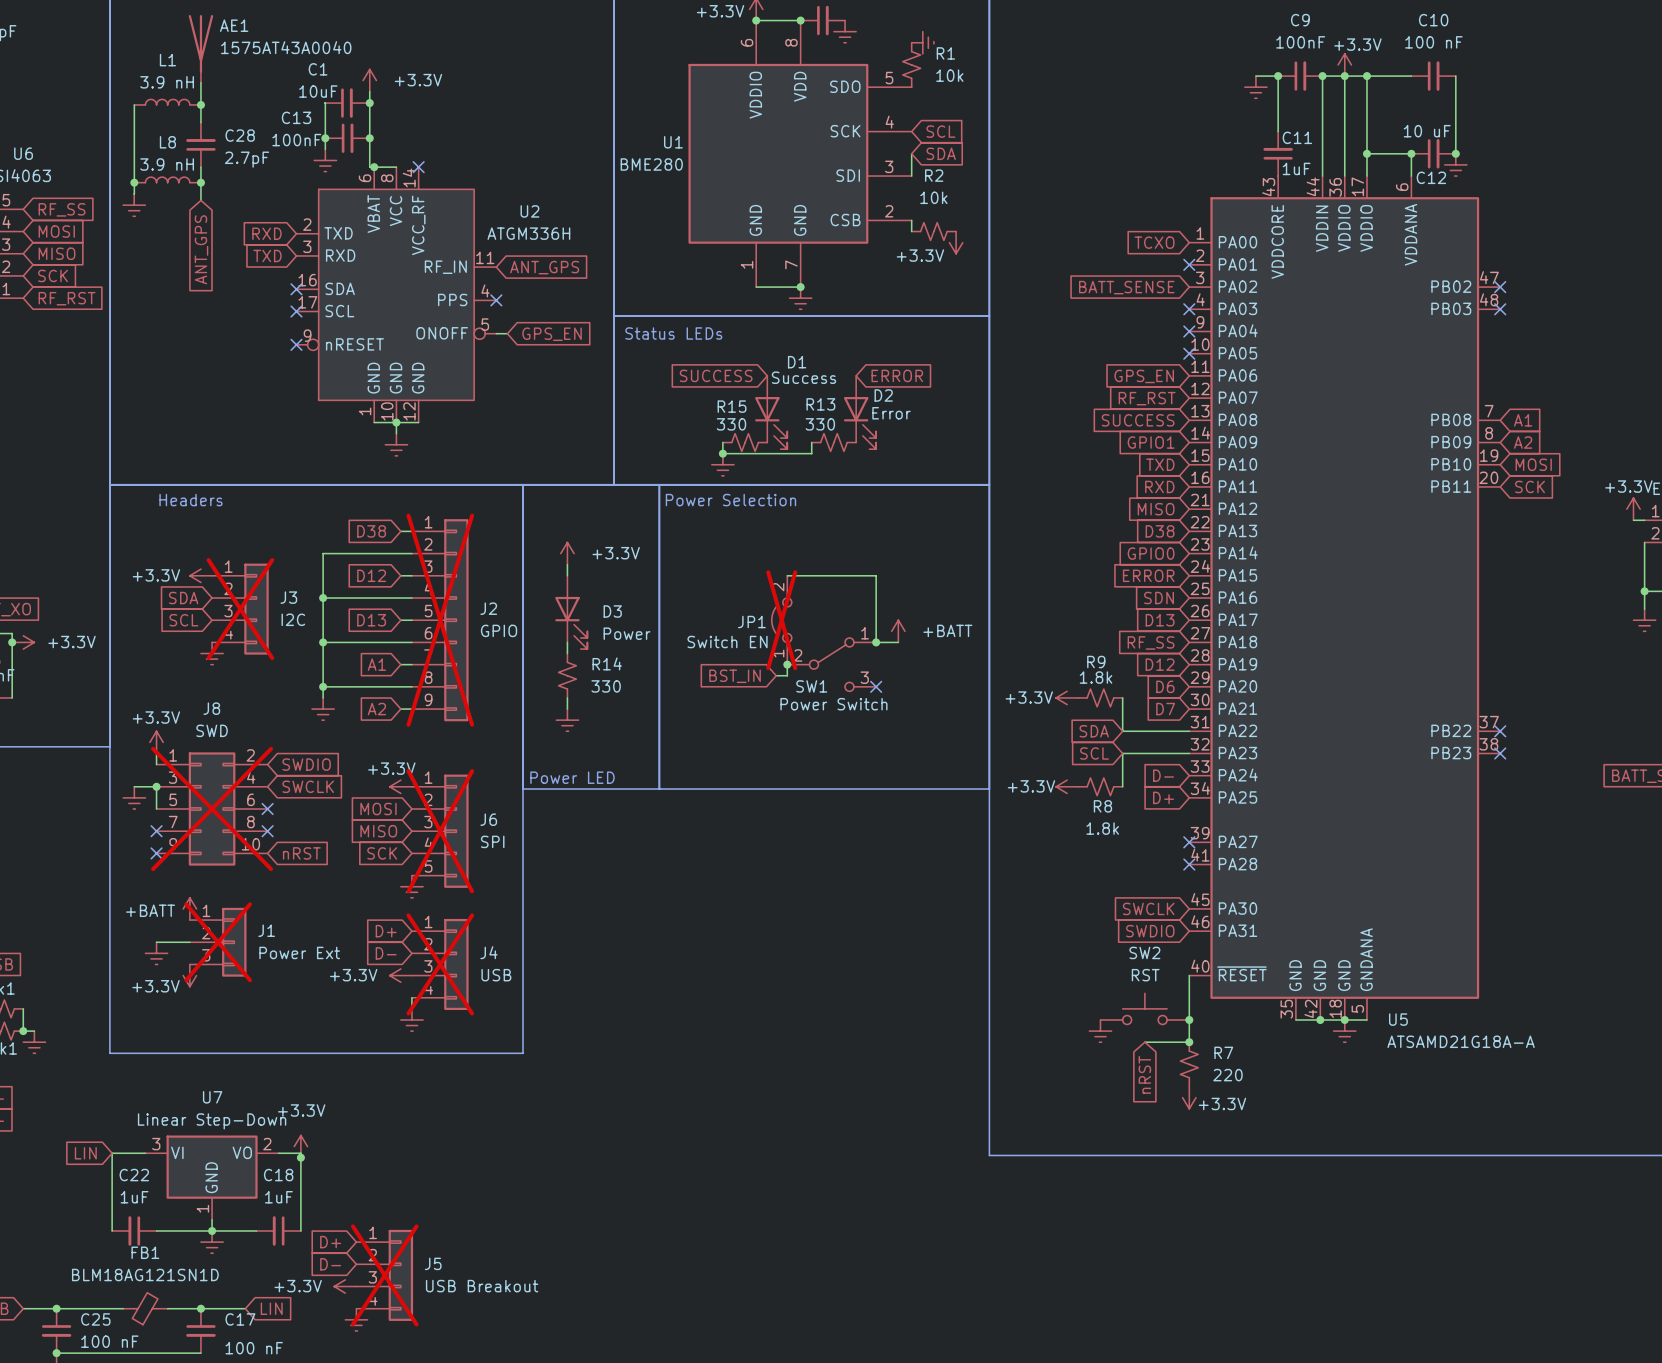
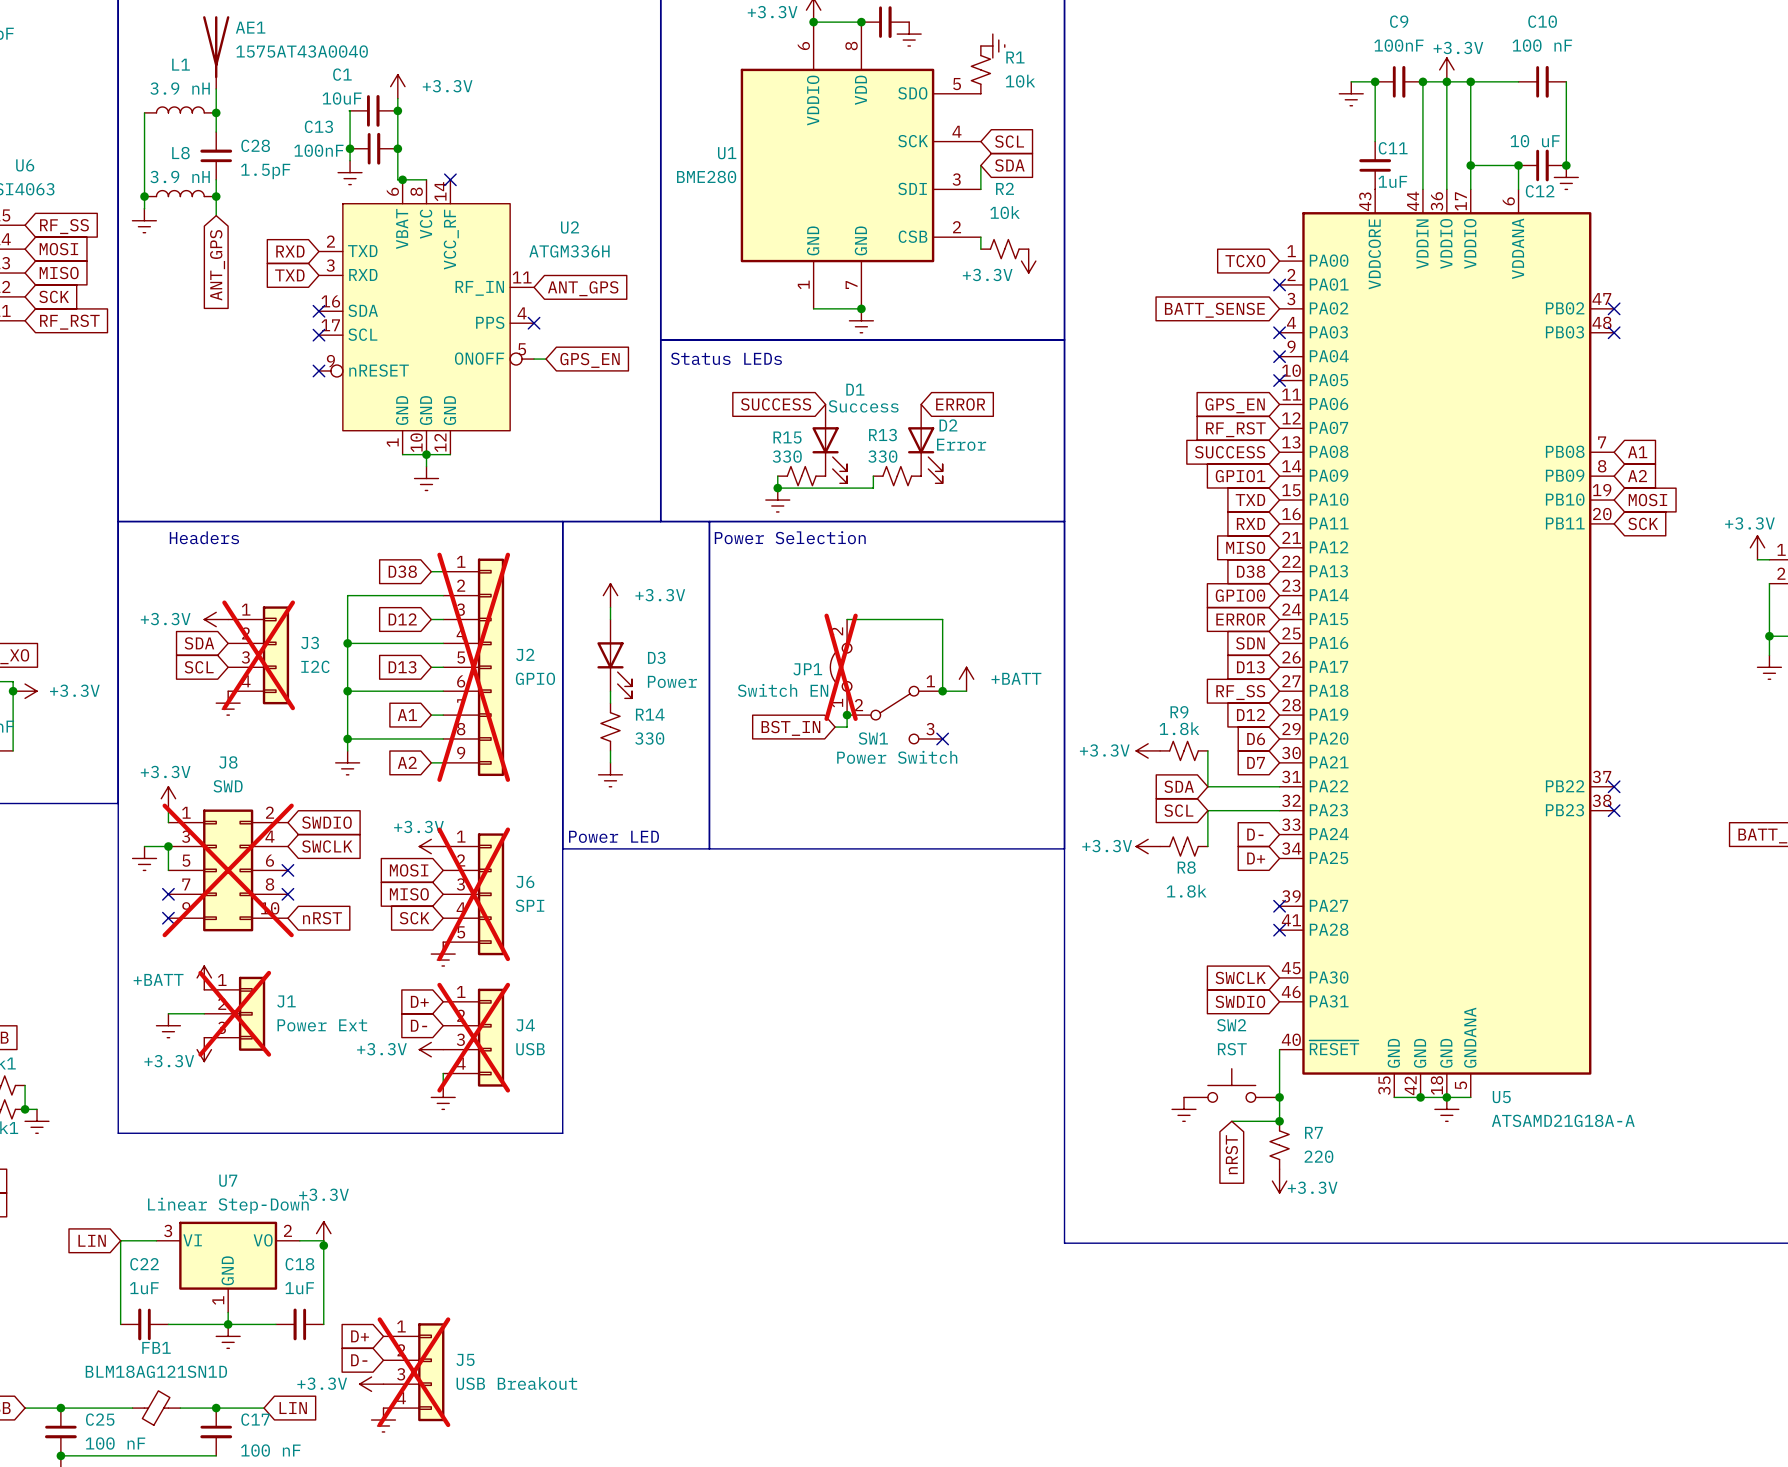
C28 value: 2.7pF (247, 159) -> 1.5pF (265, 171)

